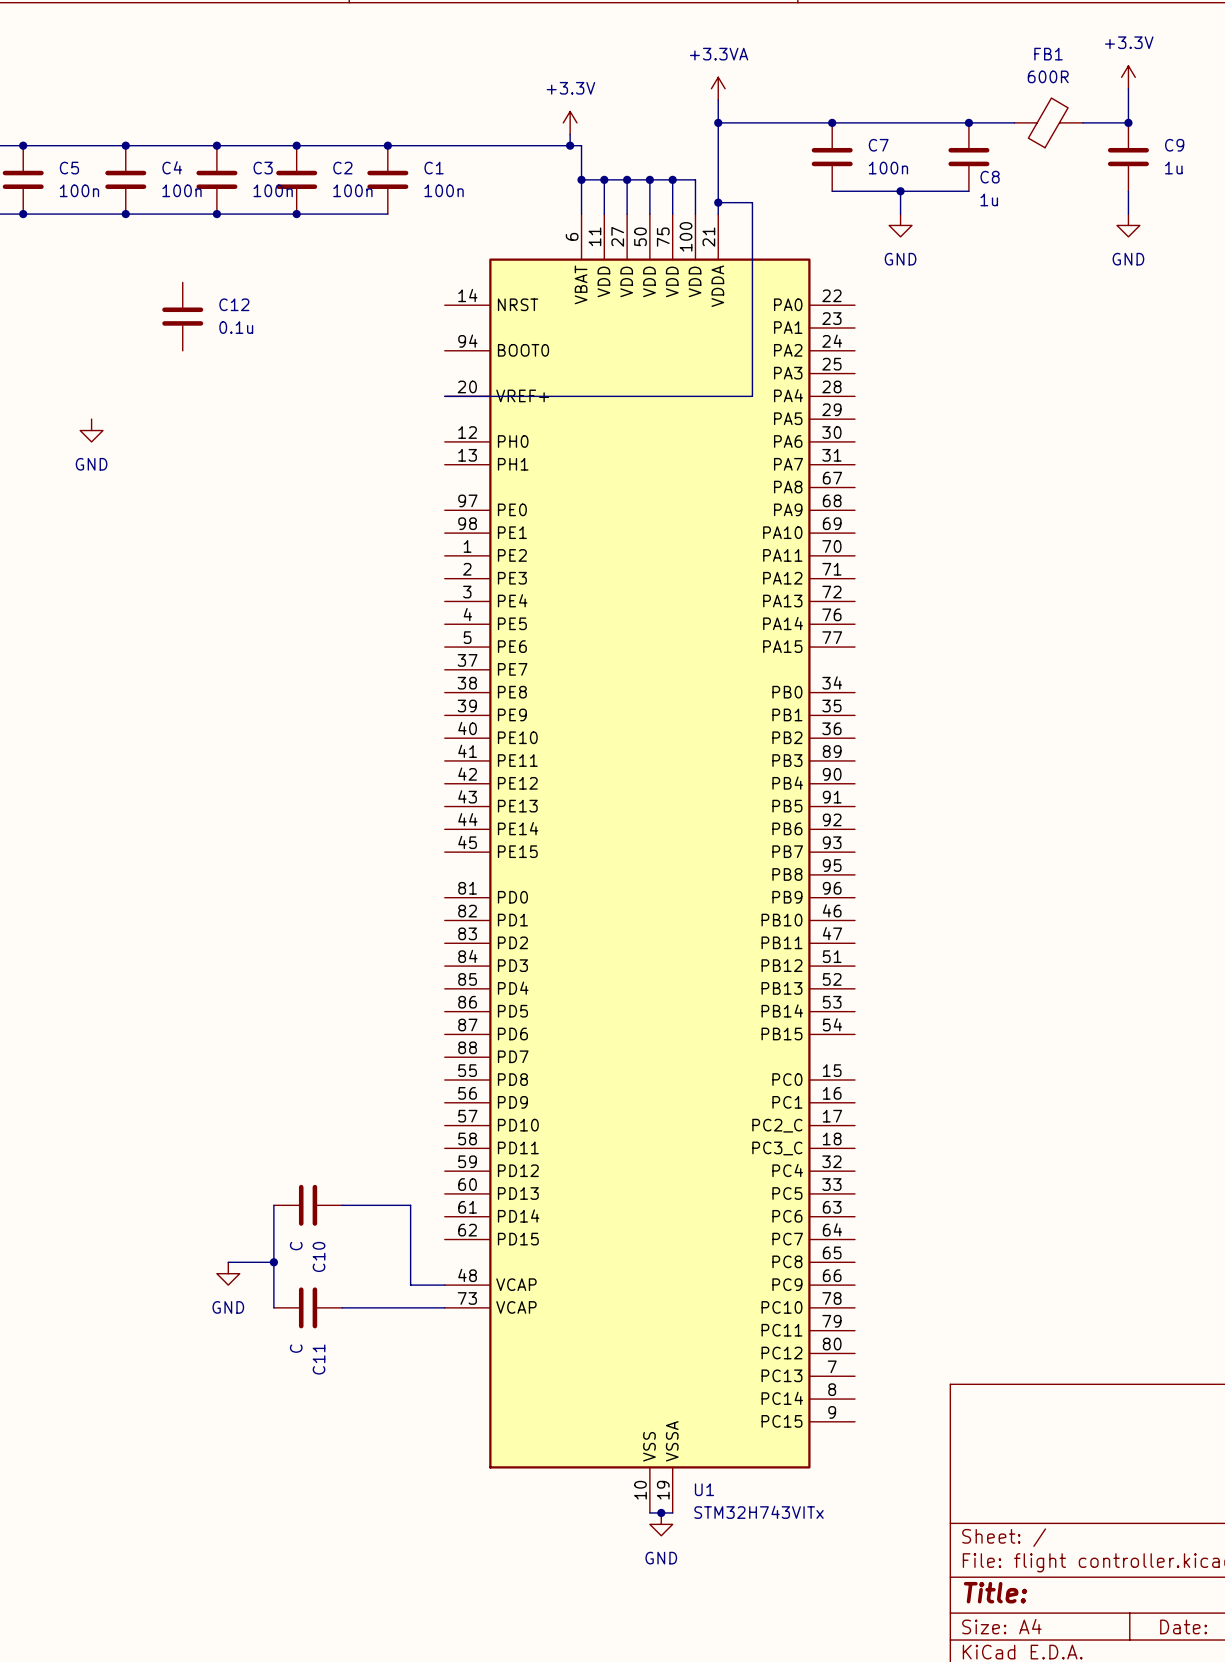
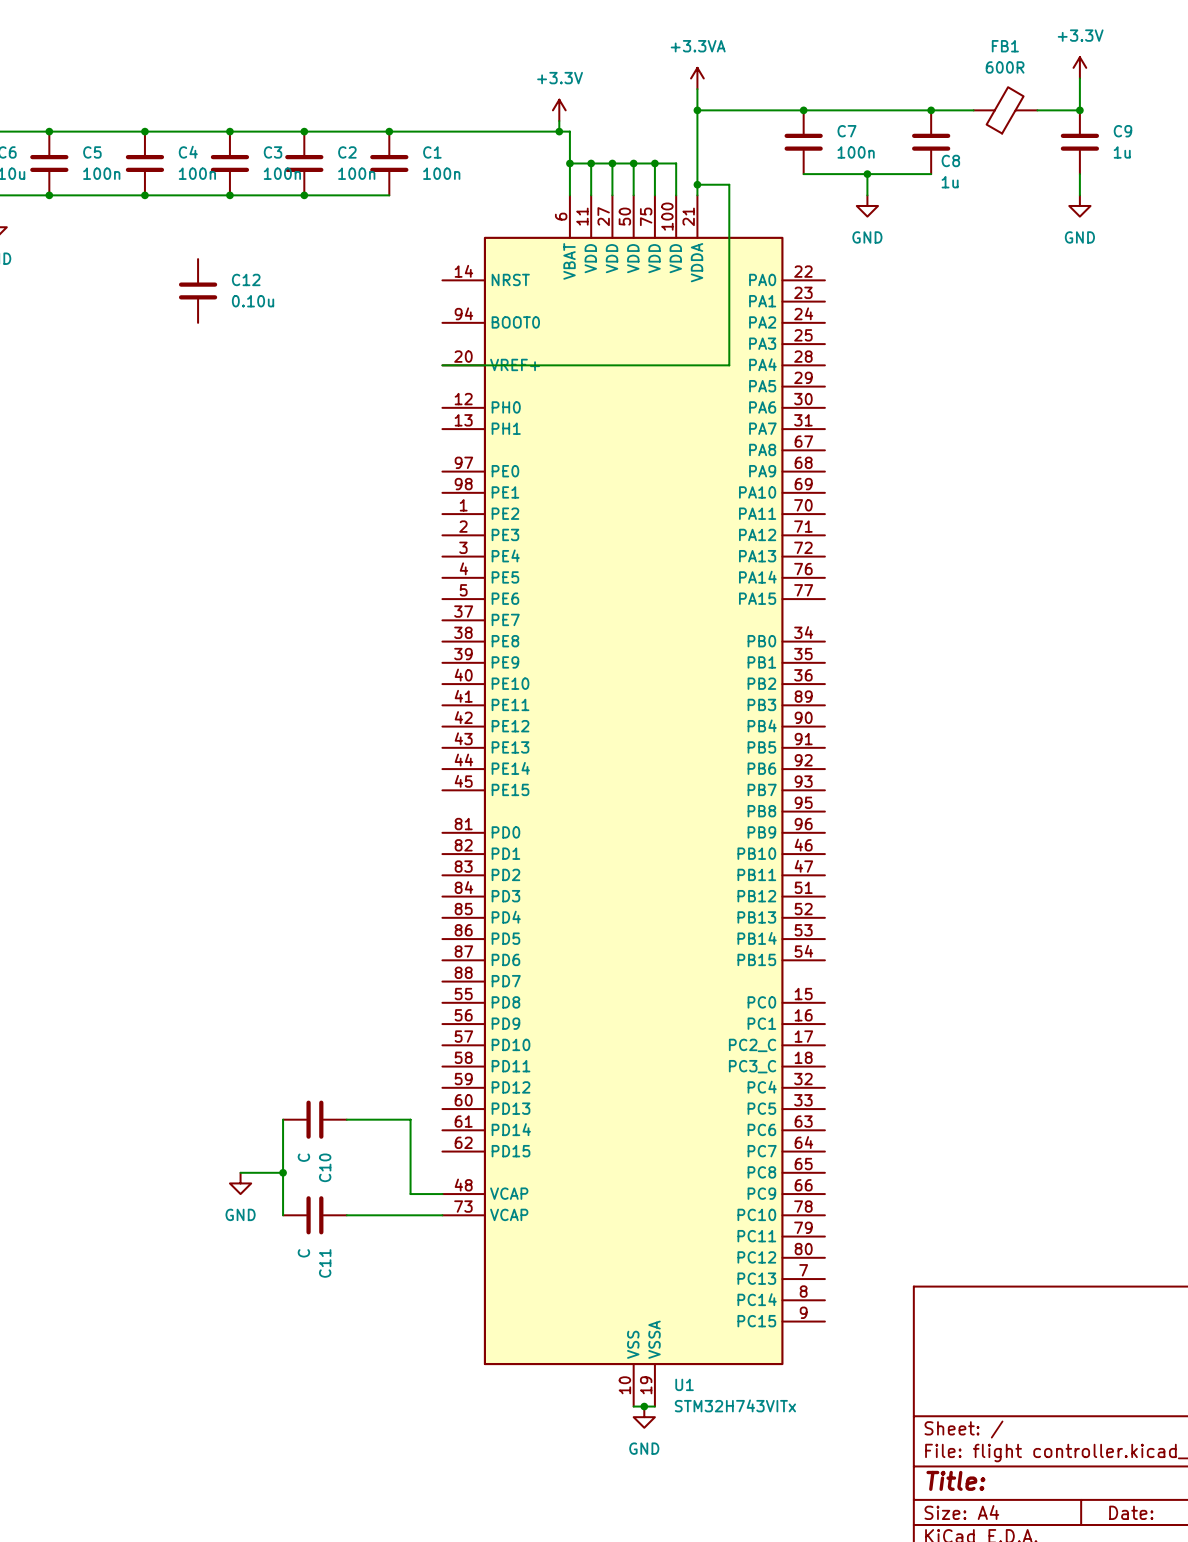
C12 value: 0.1u (236, 327) -> 0.10u (253, 301)
power symbol: GND (91, 430) -> none

